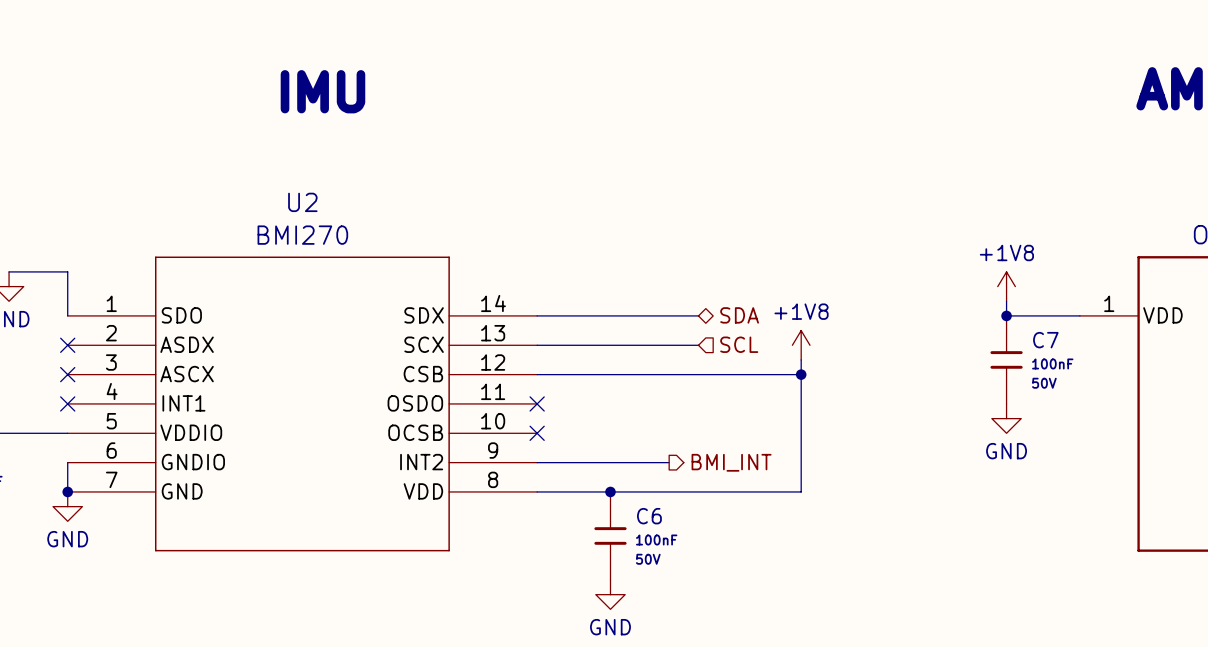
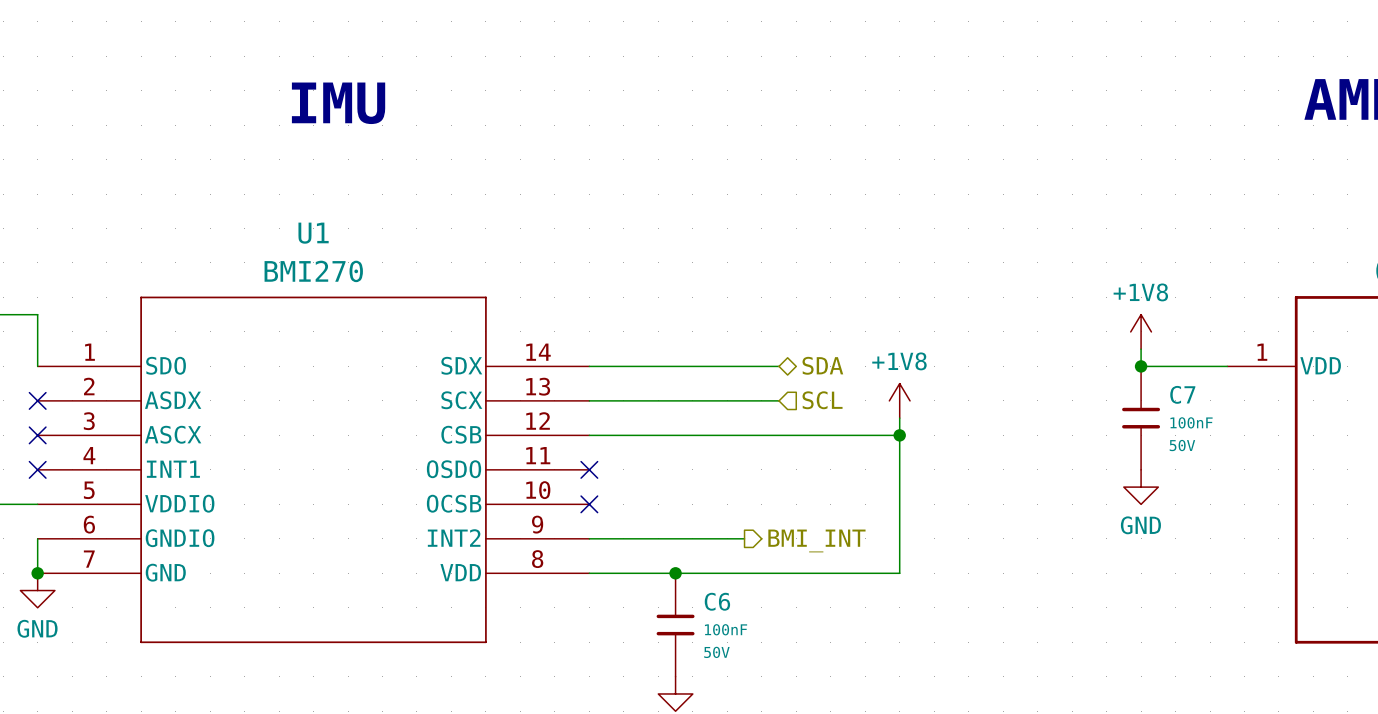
U2 name: U2 (302, 202) -> U1 (313, 233)

